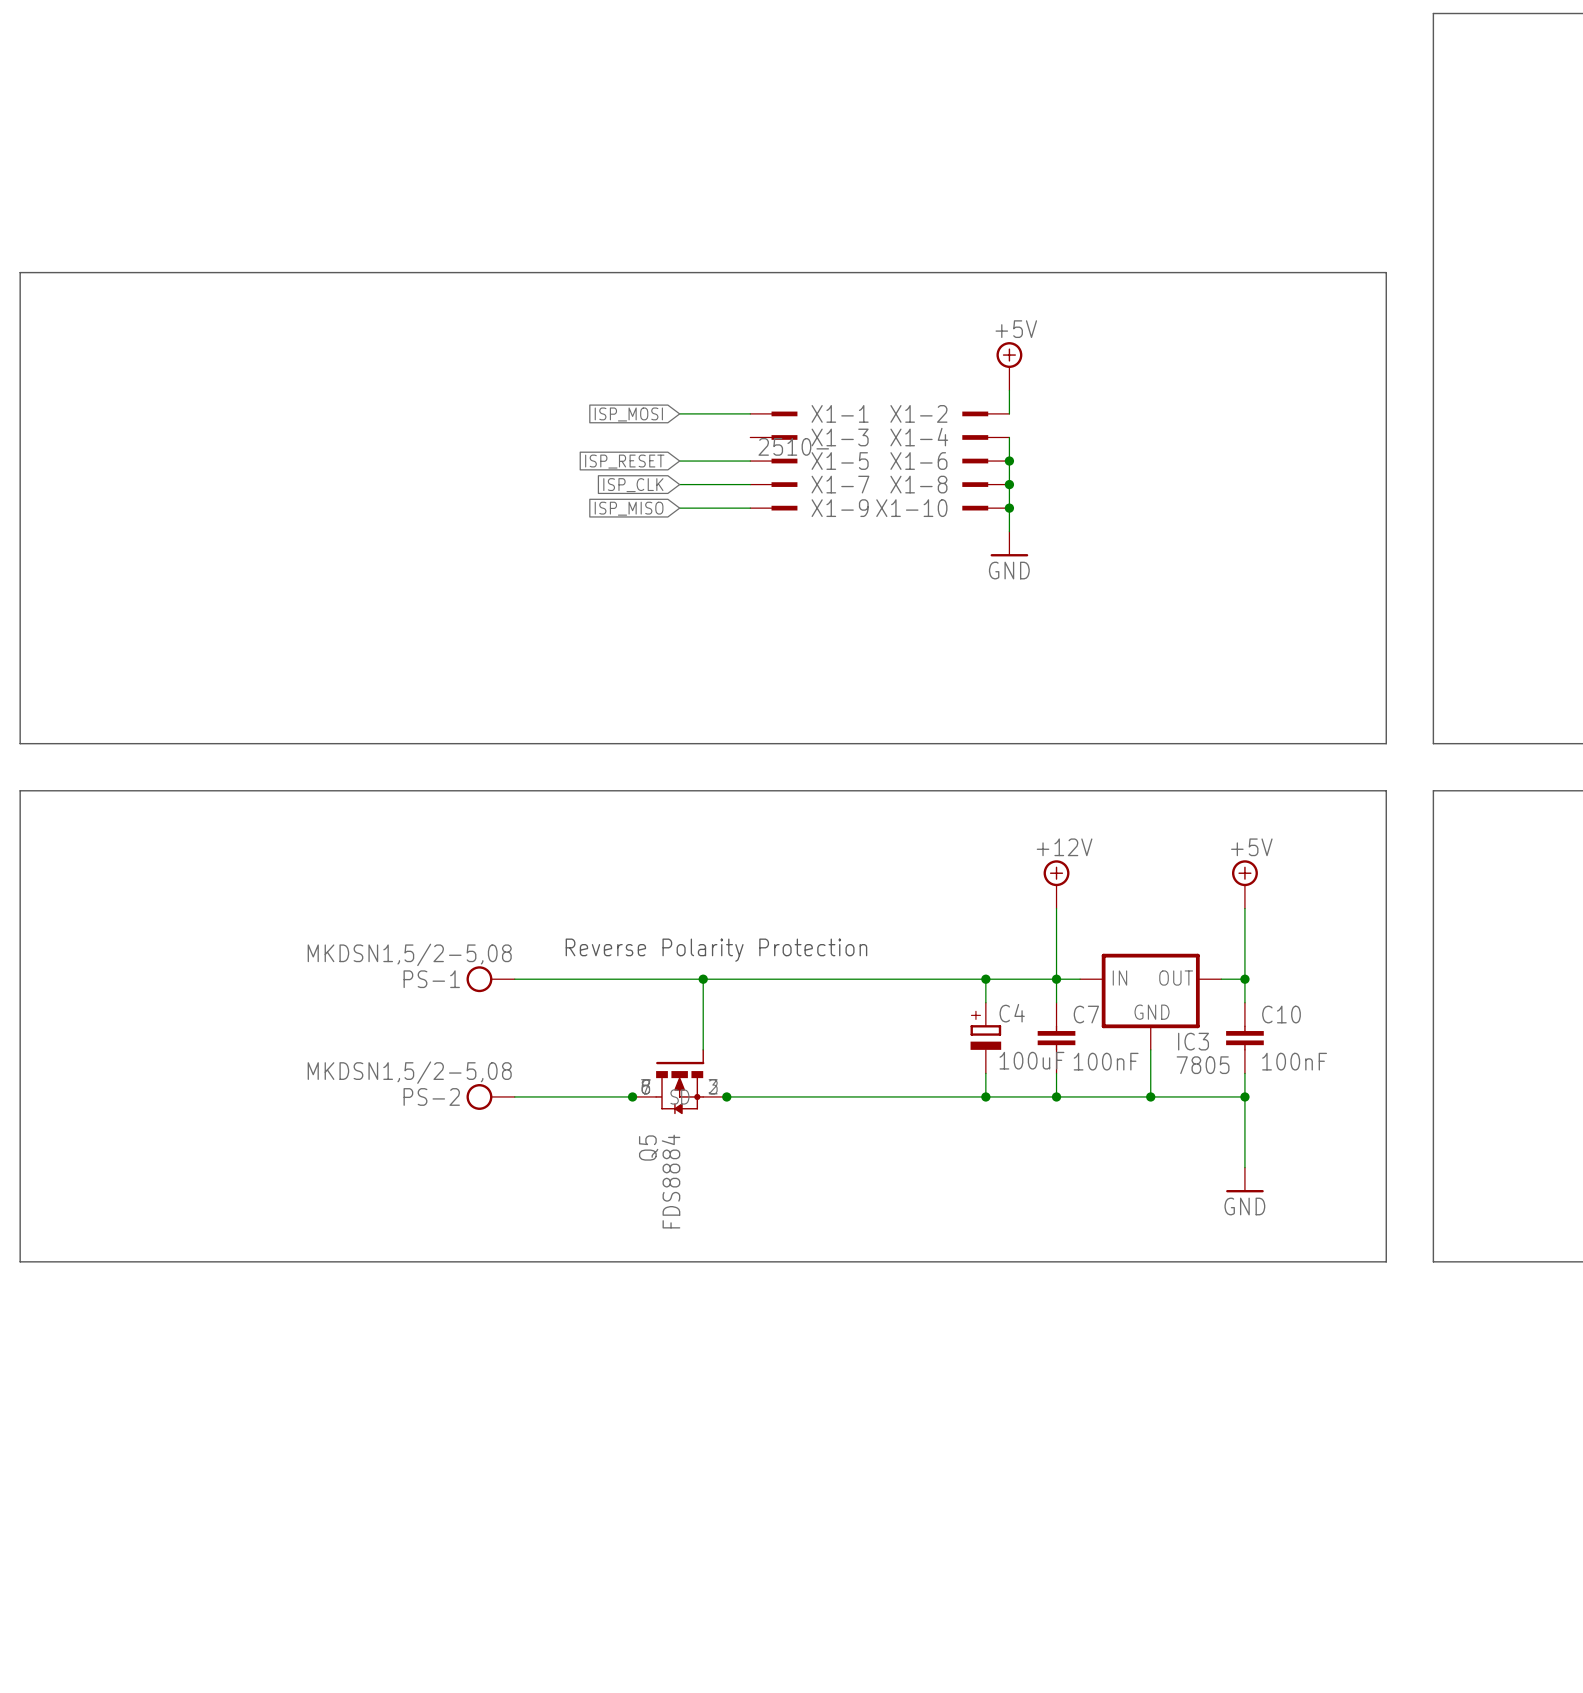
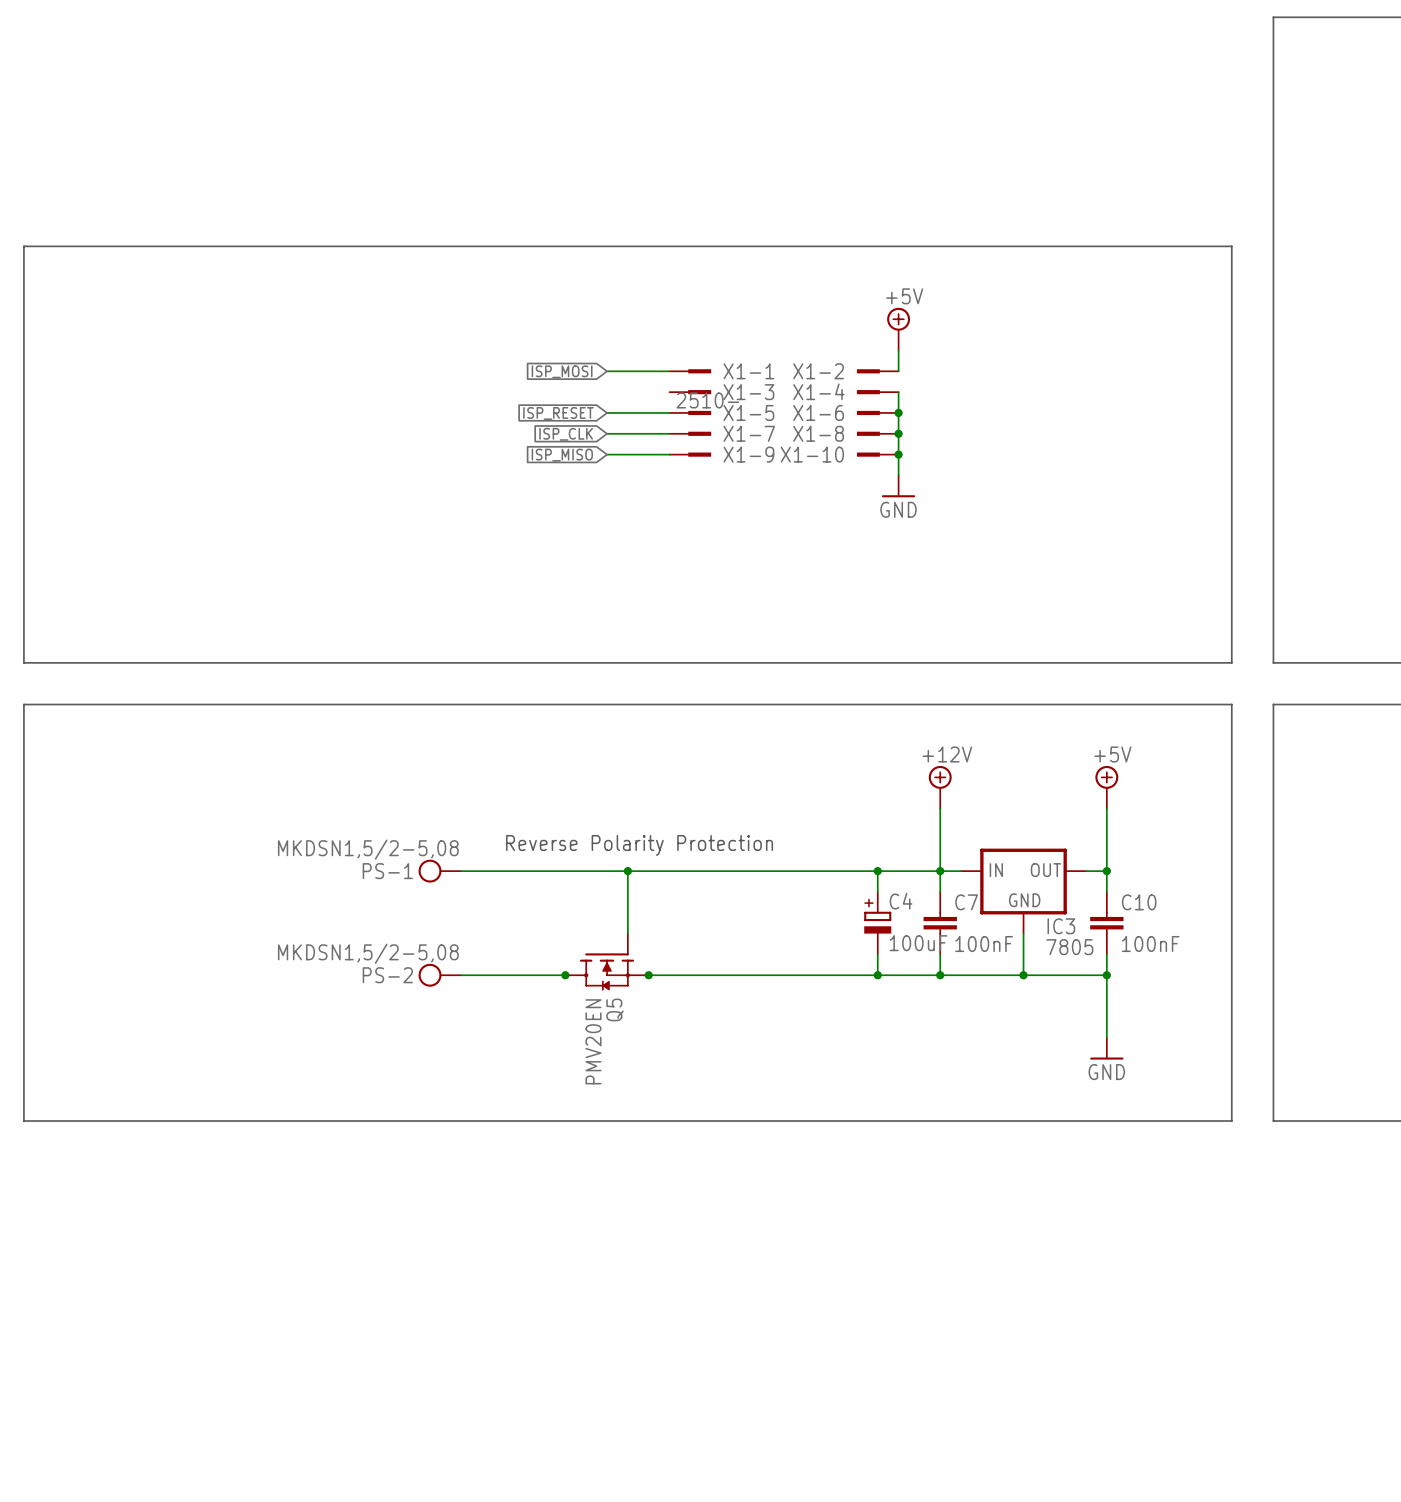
Q5 symbol: [632, 1049, 727, 1115] -> [565, 933, 649, 991]
Q5 name position: Q5 (648, 1148) -> Q5 (615, 1009)
Q5 value: FDS8884 (671, 1181) -> PMV20EN (593, 1041)

